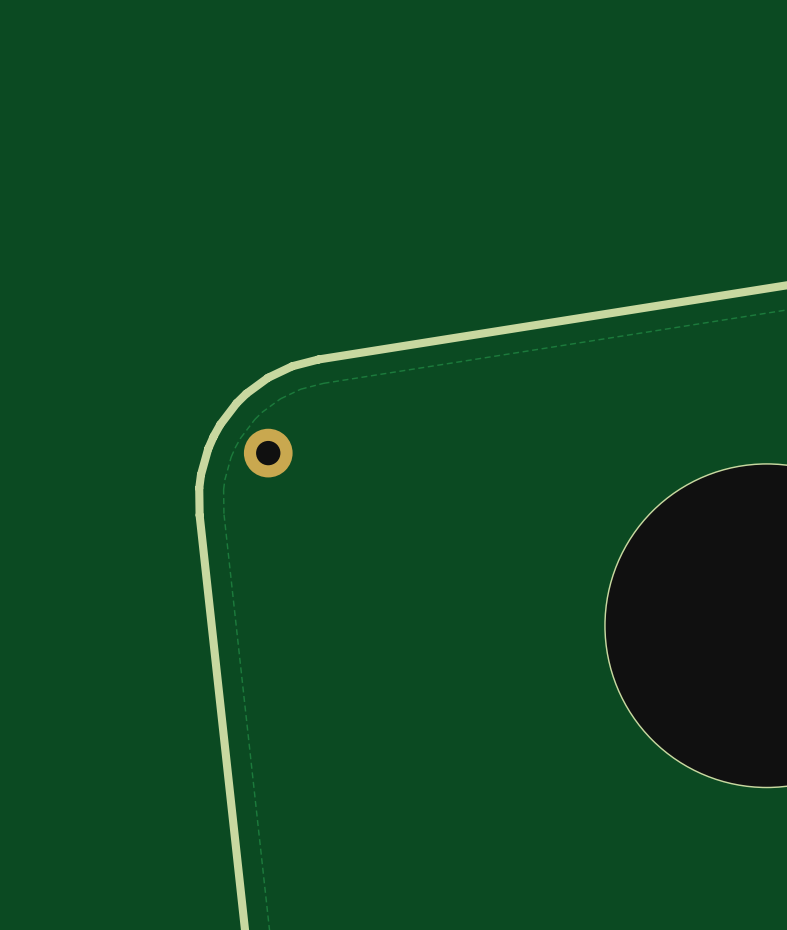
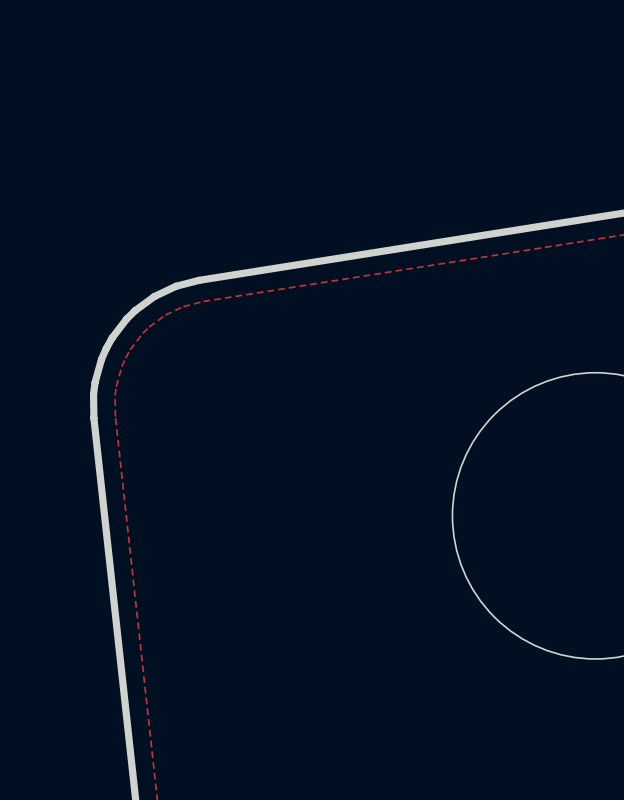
via: (268, 453) -> none

